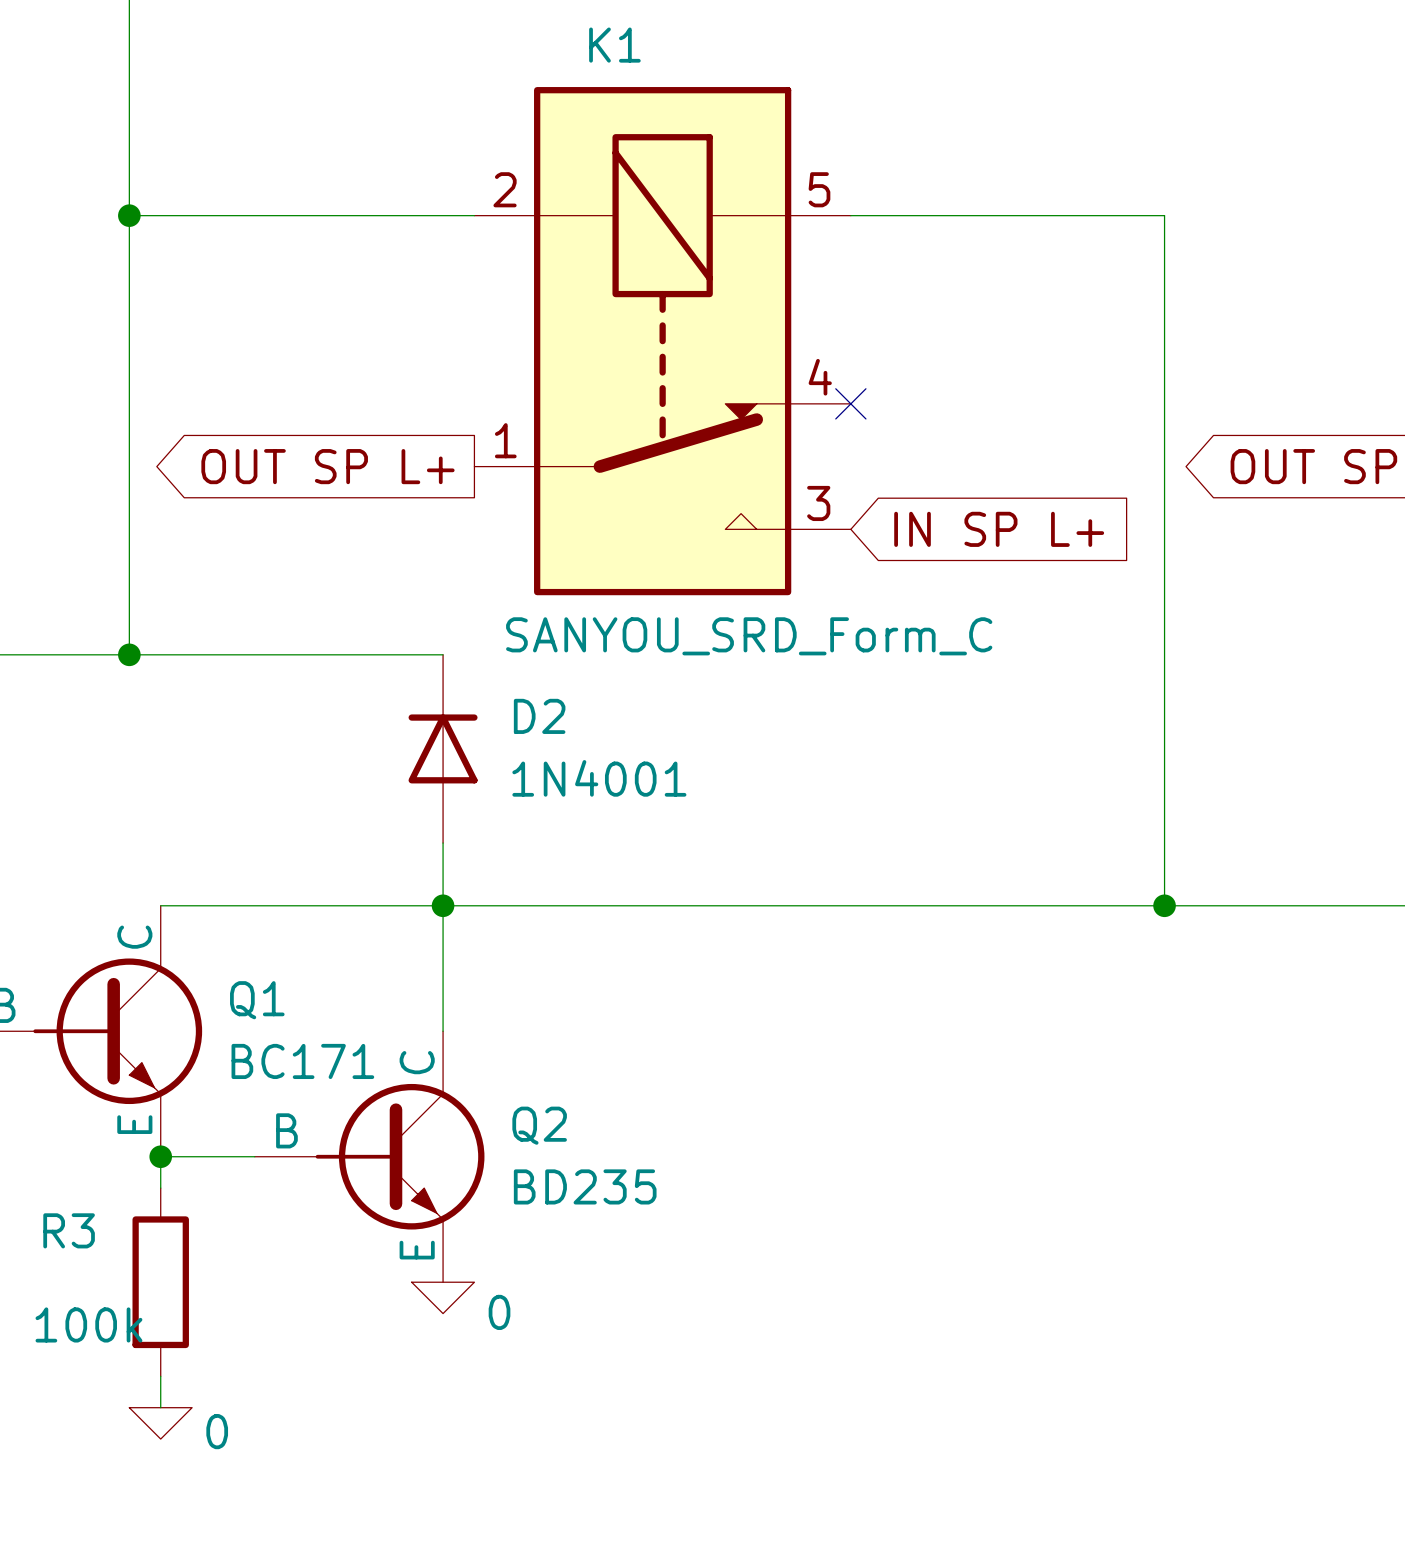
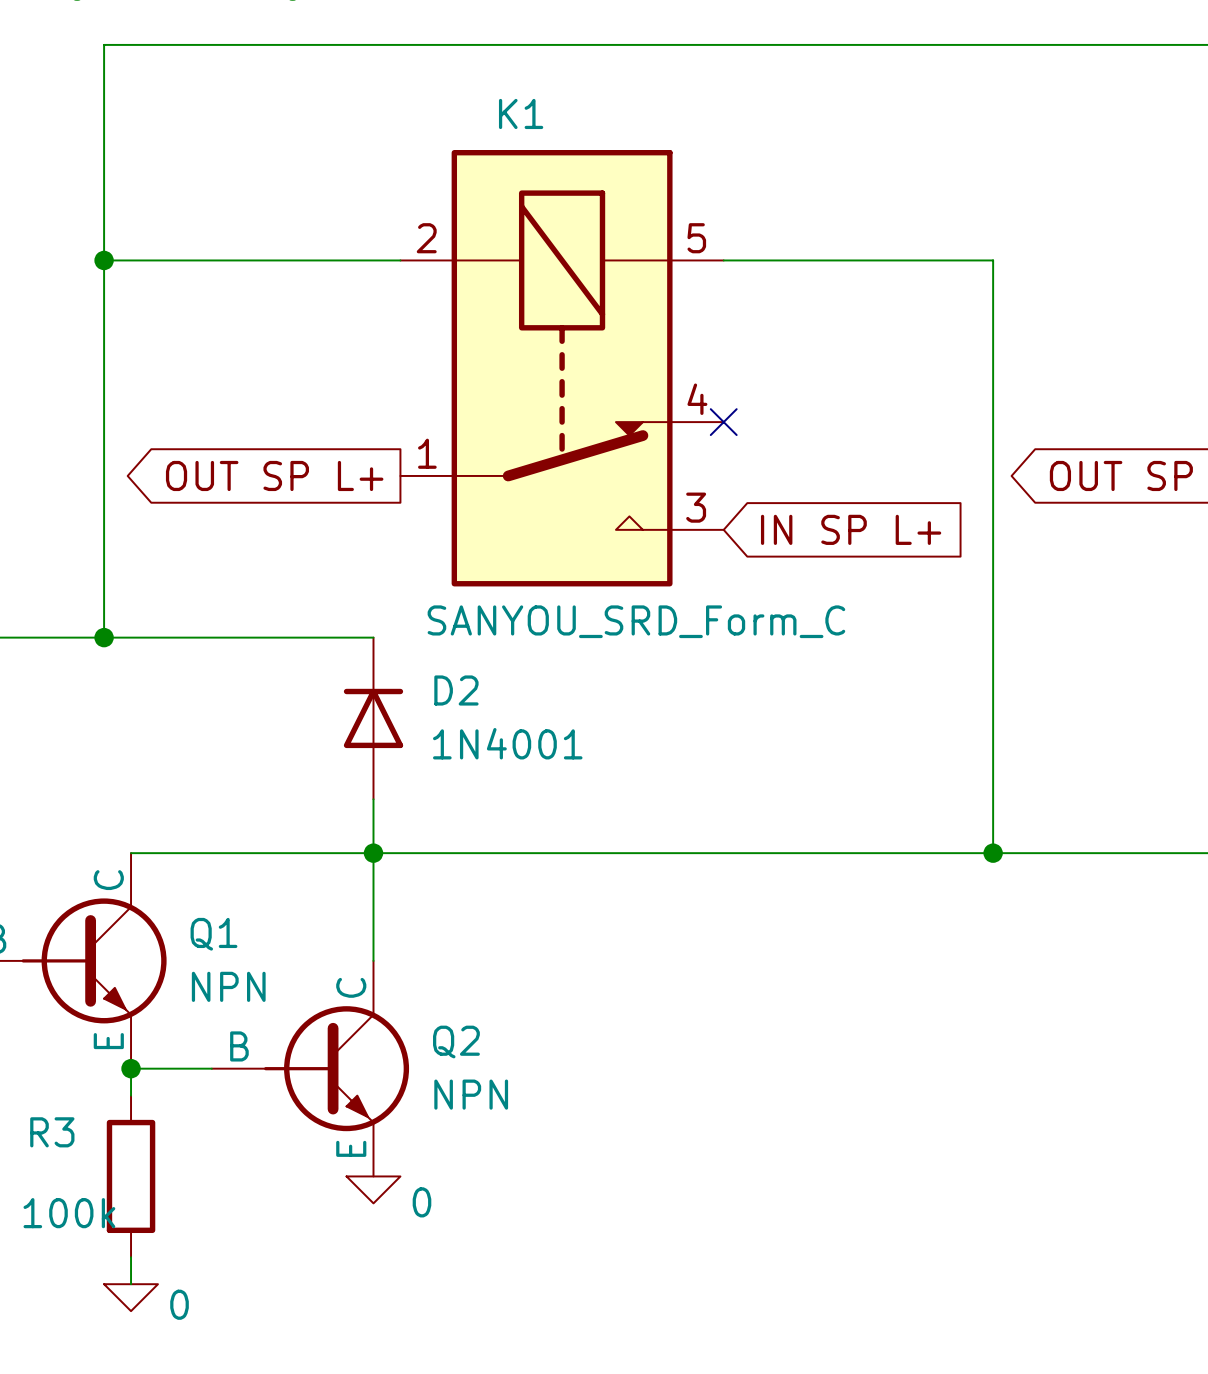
Q1 value: BC171 (302, 1061) -> NPN (228, 986)
Q2 value: BD235 (585, 1186) -> NPN (471, 1094)

